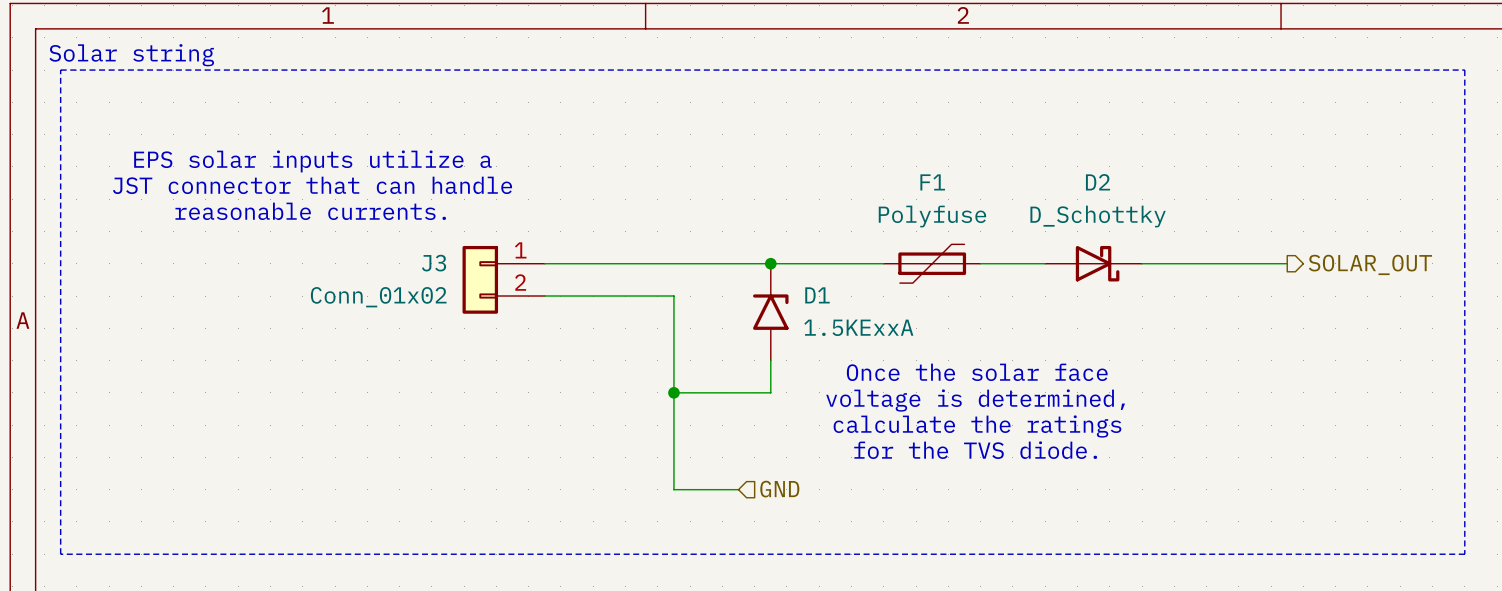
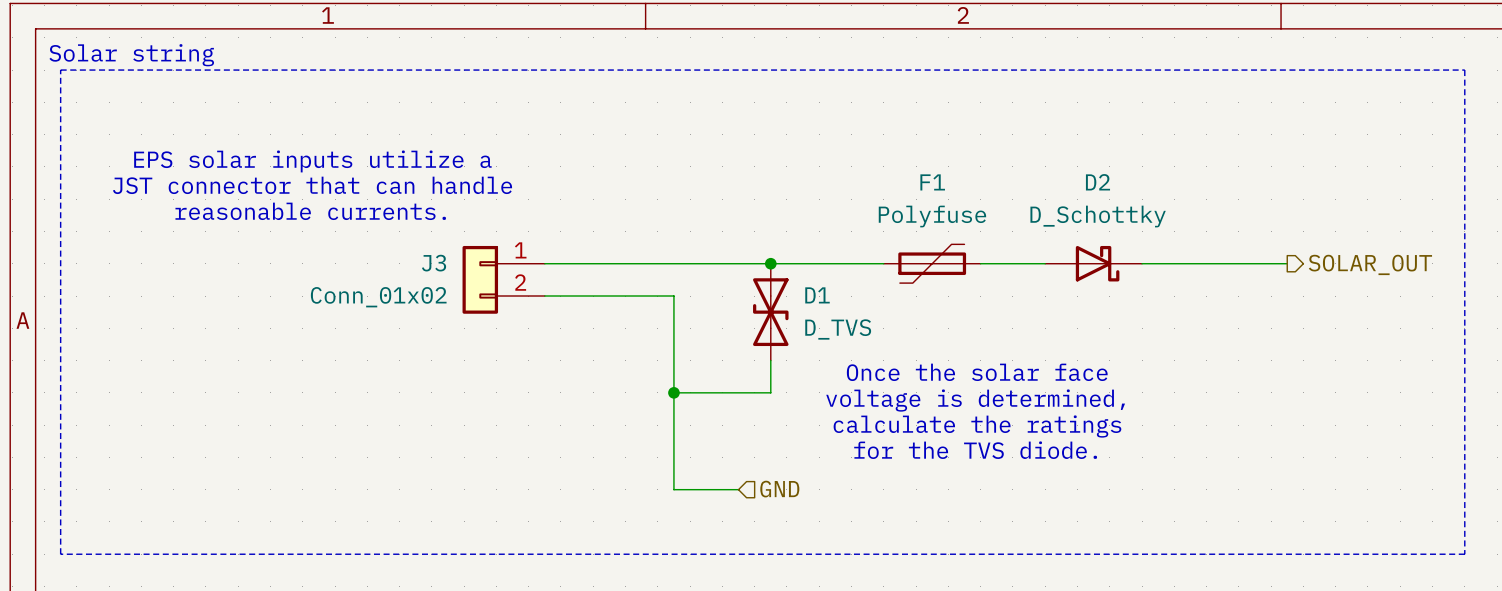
D1 symbol: [753, 263, 789, 361] -> [753, 263, 789, 361]
D1 value: 1.5KExxA (858, 327) -> D_TVS (838, 329)

